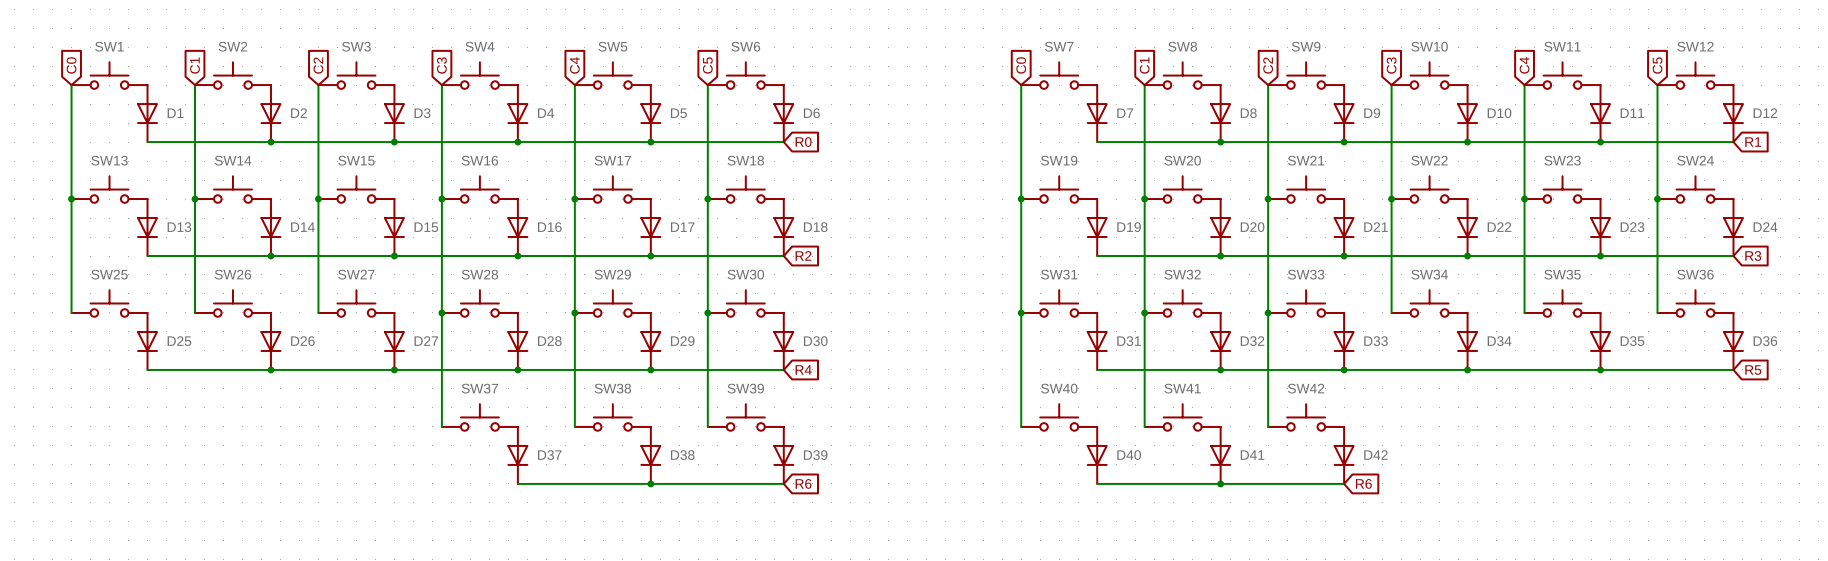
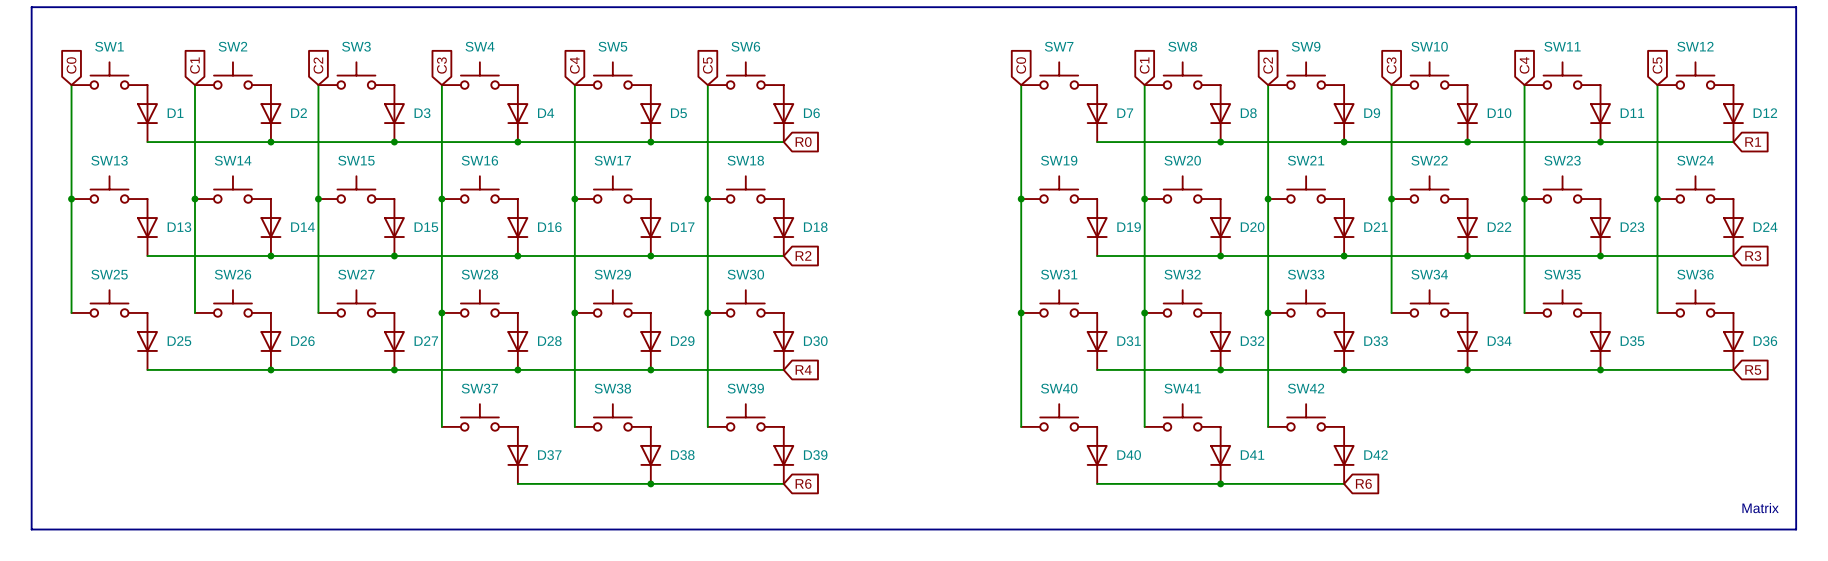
line: none -> (31, 7) (1796, 7) (1796, 529) (31, 529) (31, 7)
text: none -> Matrix (1760, 508)

